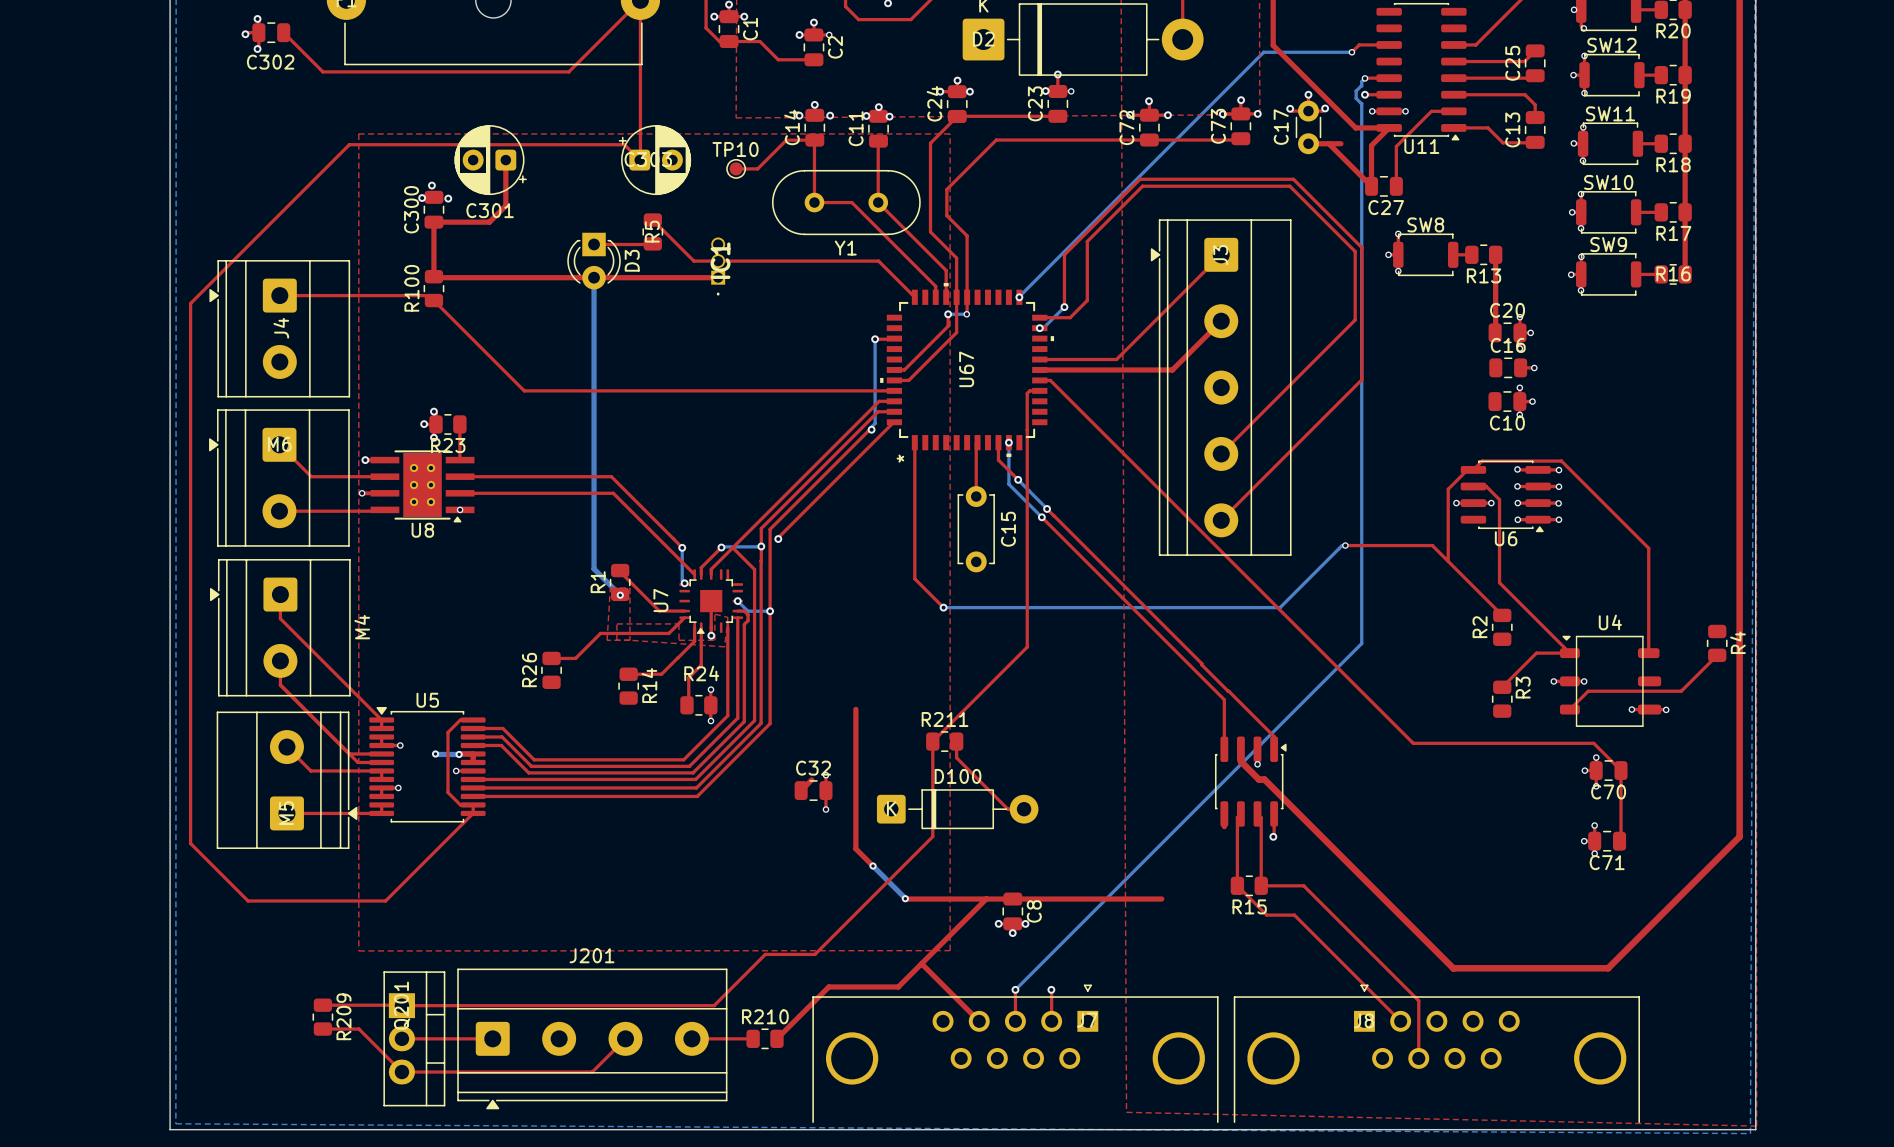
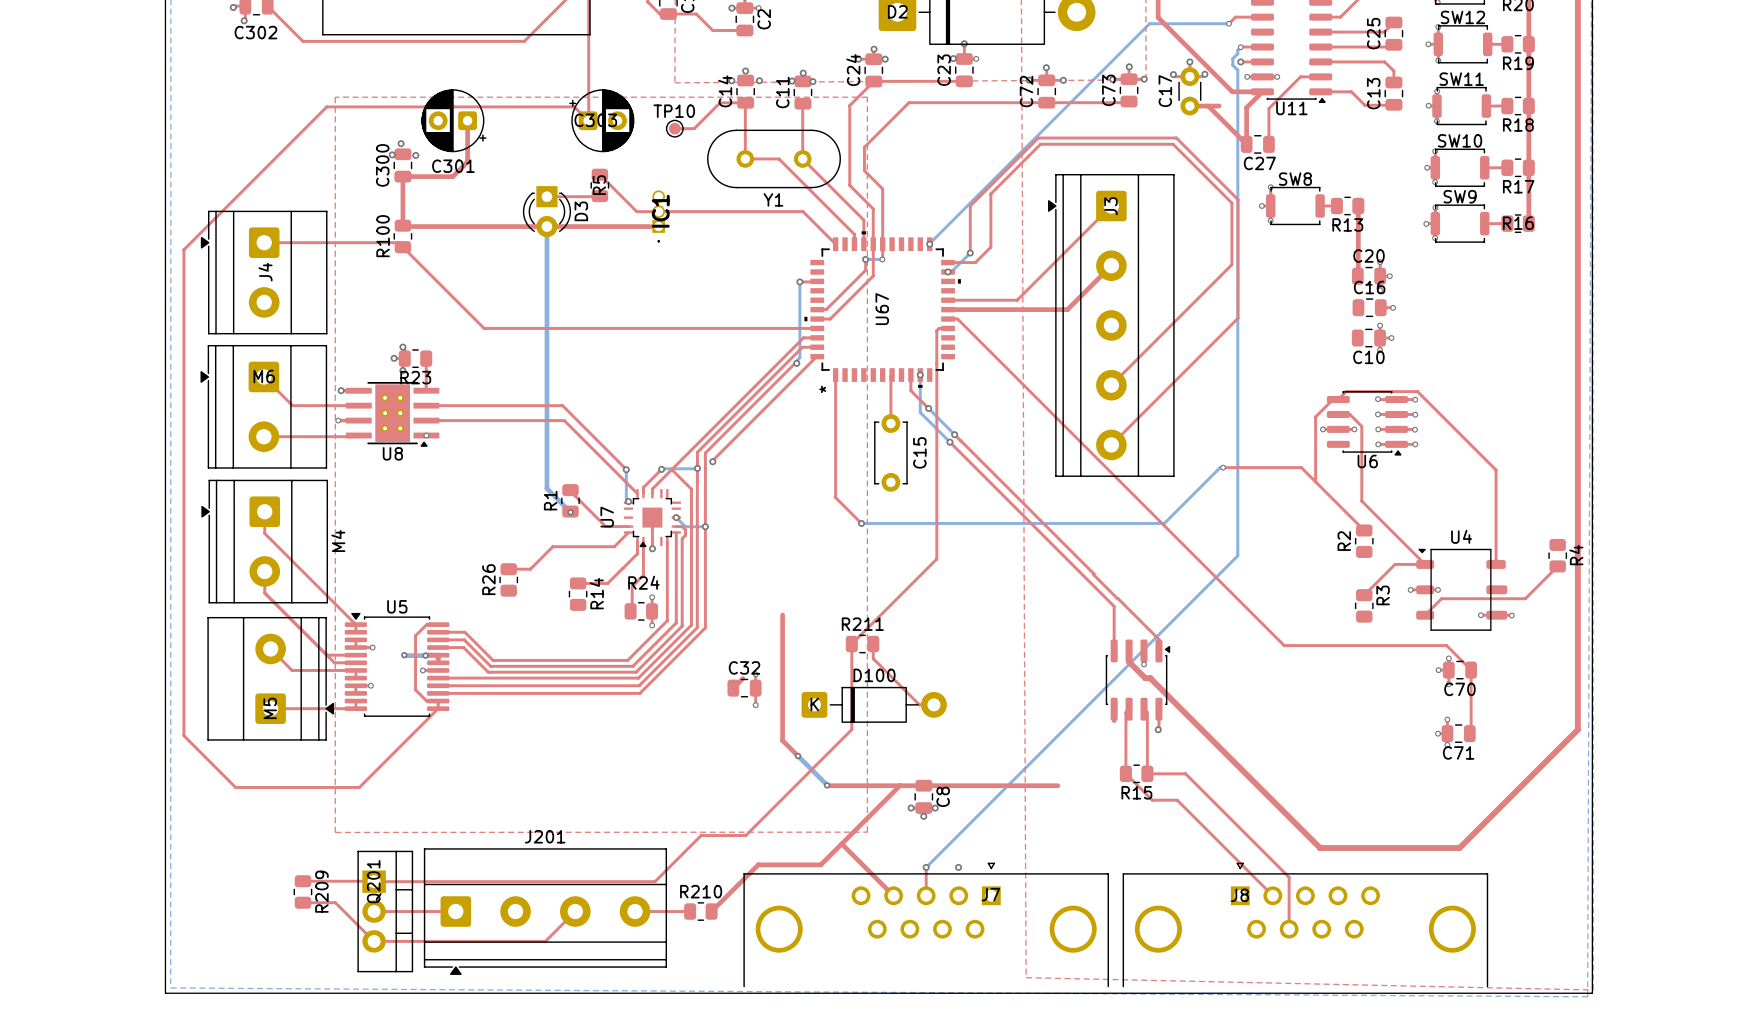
top zone outline: (616, 640) (616, 623) (678, 623) (678, 640) (714, 640) (714, 614) (727, 617) (724, 646) (629, 640) -> none
top zone outline: (629, 640) (629, 588) (610, 588) (607, 640) (629, 640) -> none
top track: (1051, 989) (1051, 1021) -> none

